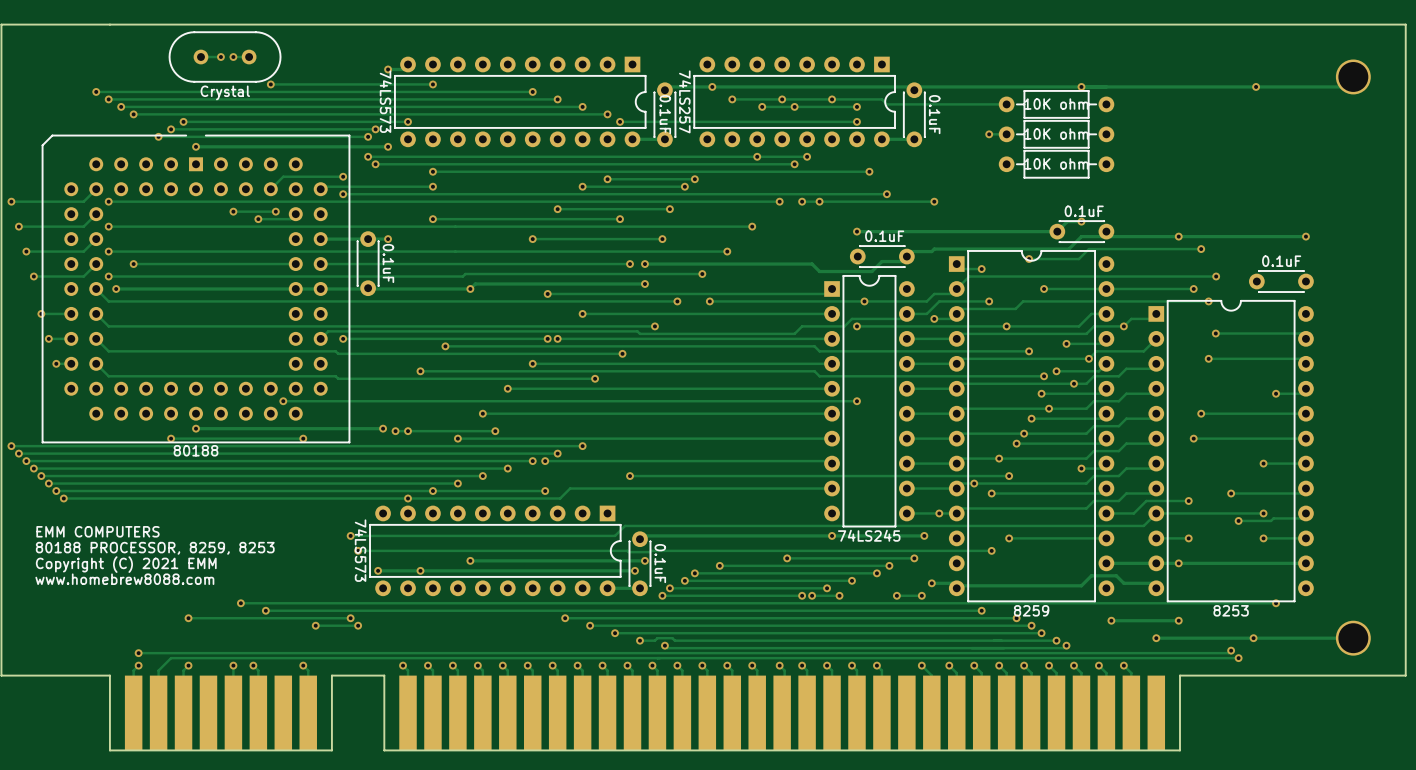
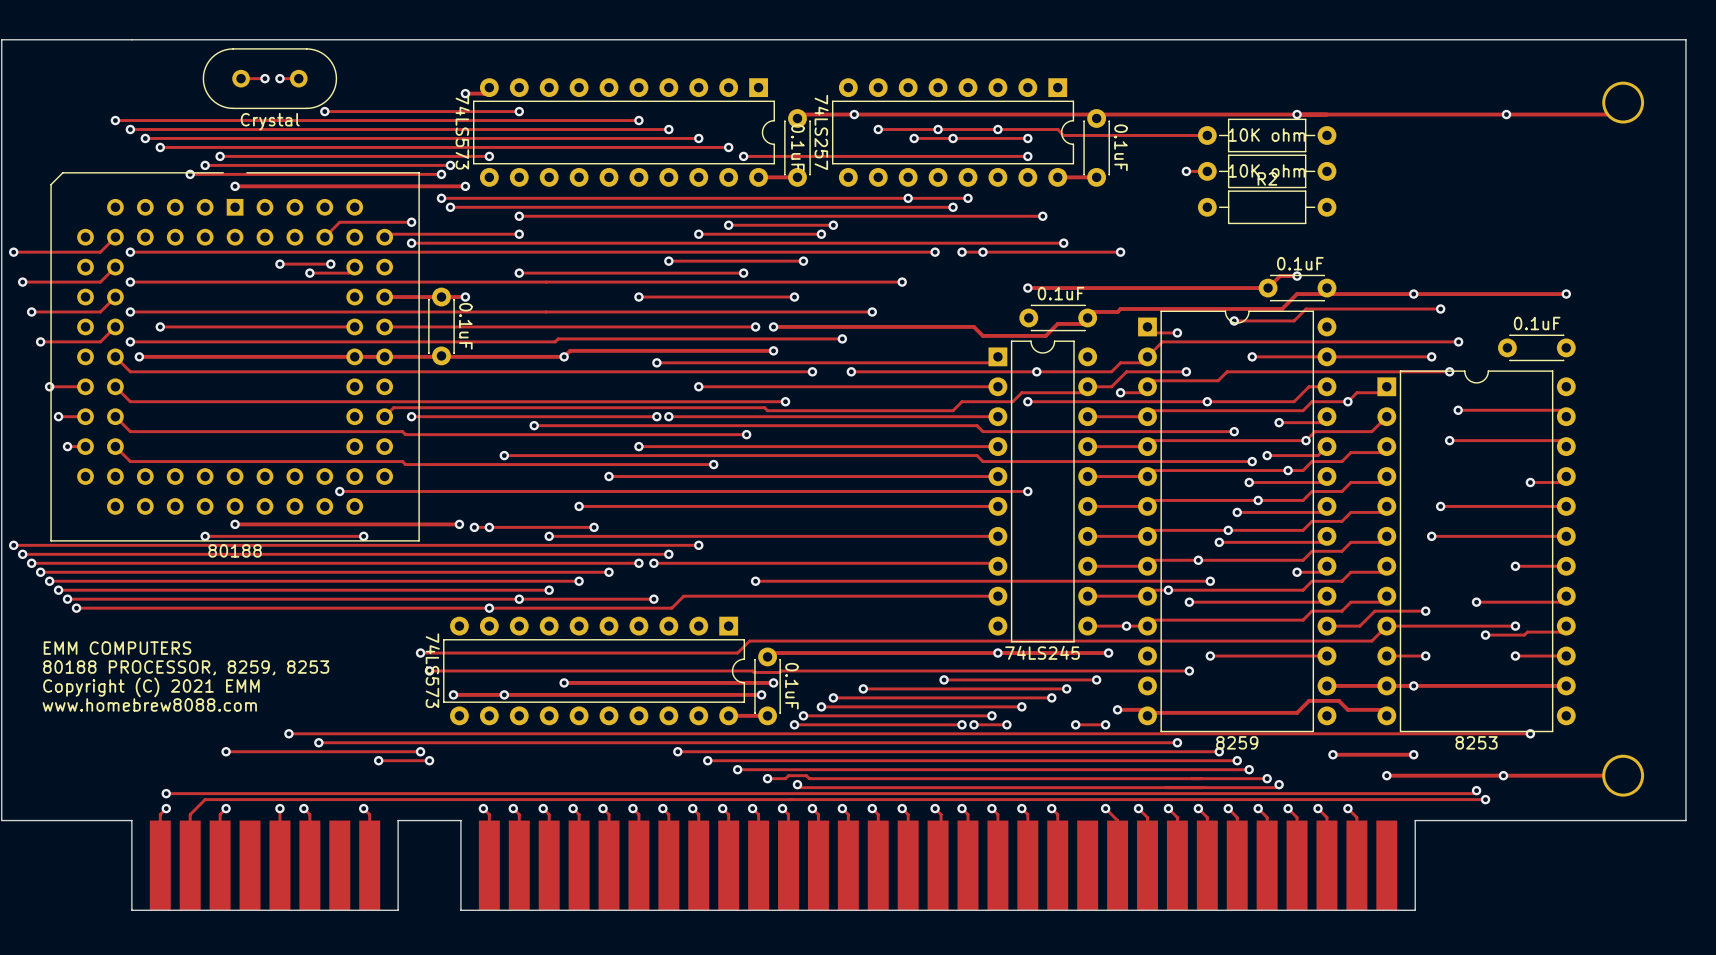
R2 name: none -> R2 (1267, 178)
R2 value: 10K ohm (1056, 163) -> none

